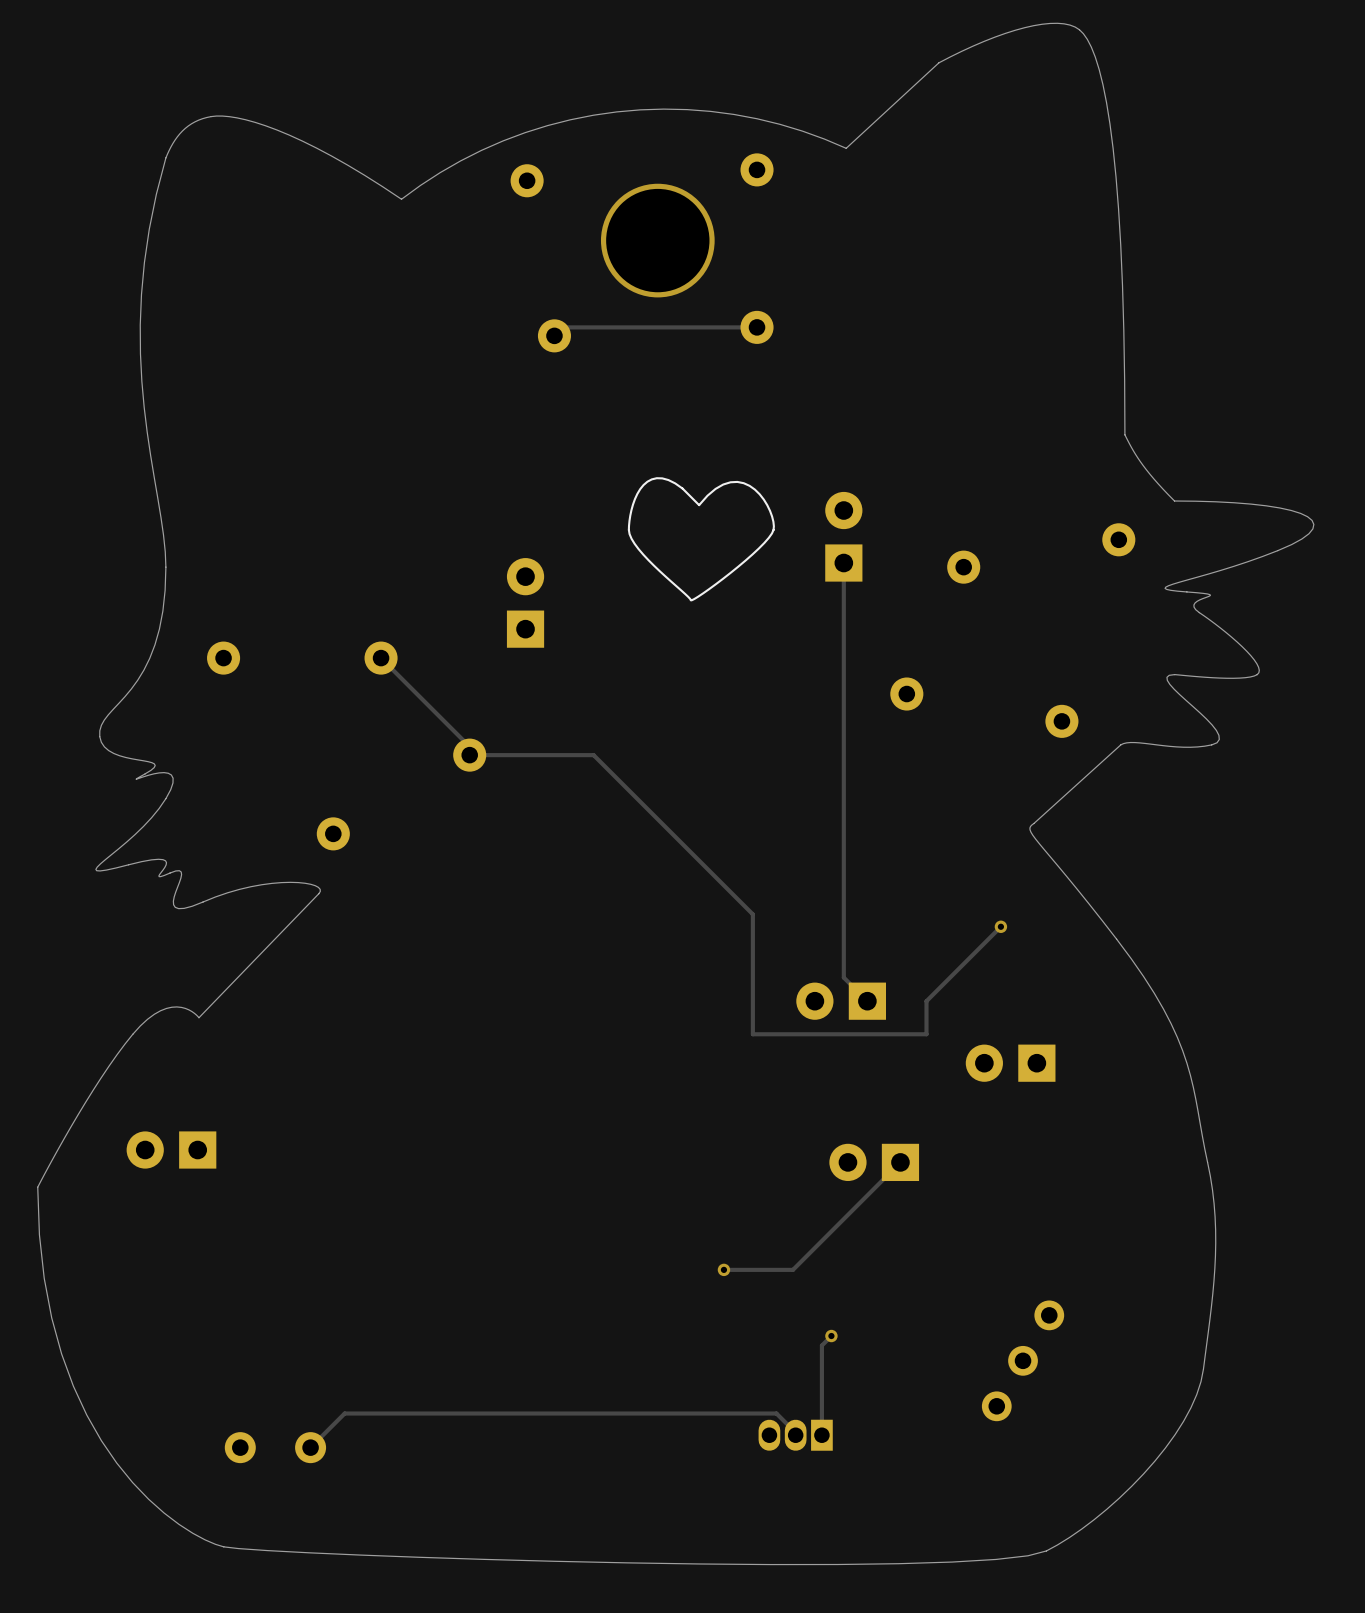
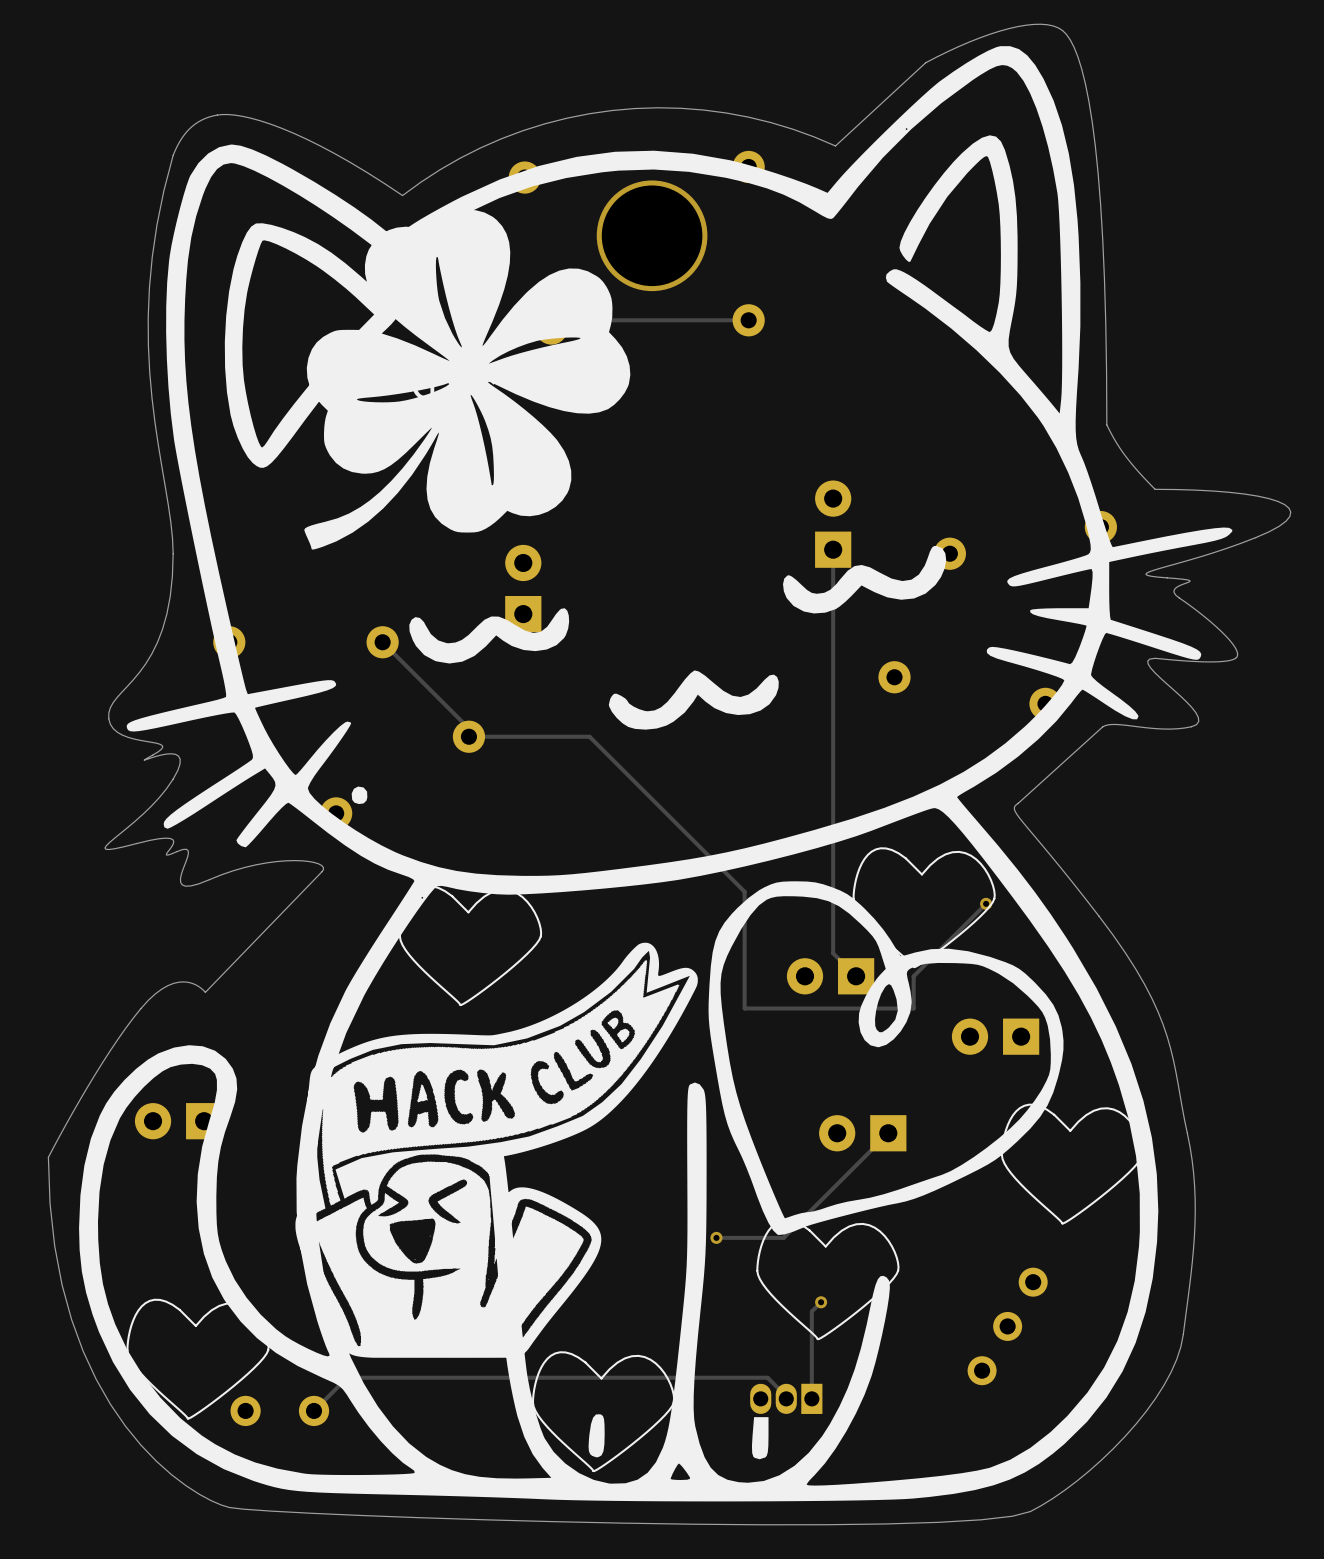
drawing: none -> [79, 46, 1233, 1502]
part: none -> (467, 379)
line: (682, 488) (699, 505) (707, 495) (723, 484) (730, 482) (743, 483) (754, 489) (763, 499) (770, 510) (773, 526) (768, 537) (752, 554) (715, 584) (691, 600) (643, 554) (631, 538) (628, 529) (634, 499) (640, 489) (647, 481) (662, 478) (682, 488) -> (905, 858) (921, 874) (930, 865) (945, 854) (952, 852) (965, 853) (976, 859) (984, 869) (990, 880) (994, 895) (989, 906) (973, 922) (938, 951) (914, 967) (867, 922) (856, 907) (853, 898) (859, 868) (871, 851) (886, 848) (905, 858)
line: none -> (452, 896) (432, 886) (418, 889) (405, 906) (399, 936) (402, 945) (413, 960) (461, 1005) (484, 989) (520, 960) (536, 944) (541, 932) (537, 918) (531, 906) (522, 897) (511, 891) (498, 890) (491, 892) (476, 903) (468, 912) (452, 896)
line: none -> (1054, 1114) (1034, 1104) (1019, 1108) (1007, 1124) (1001, 1155) (1004, 1163) (1015, 1178) (1063, 1223) (1086, 1207) (1122, 1178) (1138, 1162) (1143, 1151) (1139, 1136) (1133, 1125) (1124, 1115) (1113, 1109) (1100, 1108) (1093, 1110) (1078, 1121) (1070, 1130) (1054, 1114)
line: none -> (809, 1230) (825, 1246) (833, 1237) (849, 1226) (856, 1224) (869, 1225) (880, 1231) (888, 1241) (894, 1252) (898, 1267) (893, 1278) (877, 1294) (842, 1323) (818, 1339) (771, 1294) (759, 1279) (757, 1270) (763, 1240) (775, 1223) (789, 1220) (809, 1230)
line: none -> (179, 1309) (195, 1325) (203, 1316) (219, 1305) (226, 1303) (239, 1304) (250, 1310) (258, 1320) (264, 1331) (268, 1346) (263, 1357) (247, 1373) (212, 1402) (188, 1418) (141, 1374) (130, 1358) (127, 1350) (133, 1320) (145, 1303) (159, 1299) (179, 1309)
line: none -> (585, 1362) (601, 1378) (609, 1369) (624, 1358) (631, 1356) (644, 1357) (655, 1363) (664, 1373) (670, 1384) (674, 1399) (669, 1410) (653, 1426) (617, 1455) (594, 1471) (546, 1426) (535, 1411) (532, 1402) (538, 1372) (551, 1355) (565, 1352) (585, 1362)

